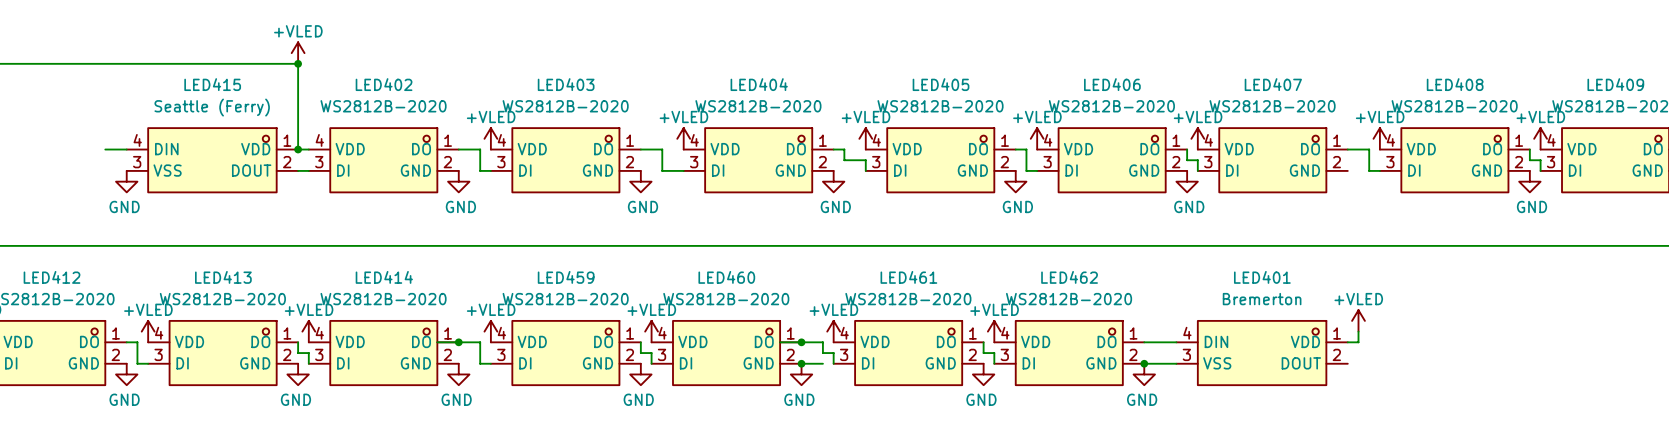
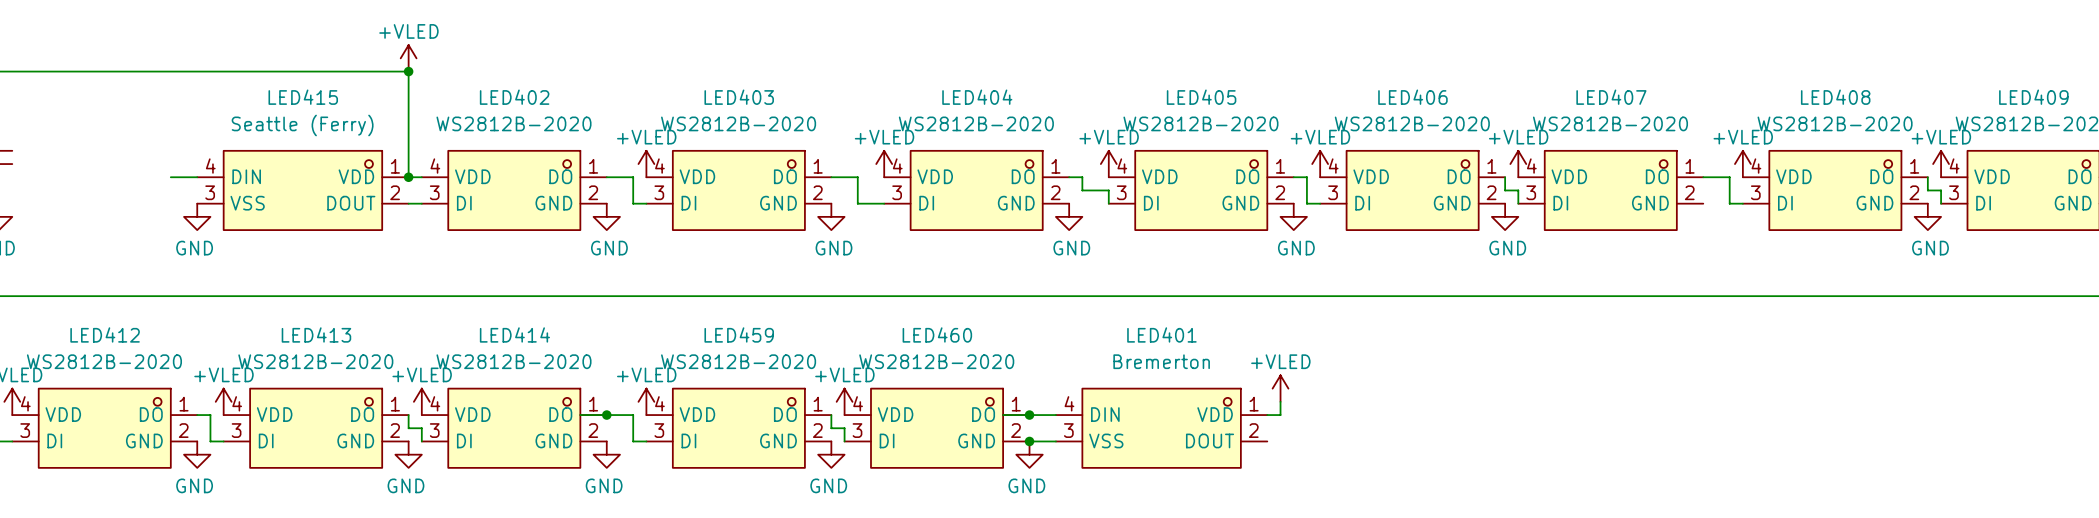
power symbol: +VLED (1358, 320) -> none
power symbol: +VLED (833, 331) -> none
power symbol position: +VLED (994, 331) -> +VLED (1280, 388)
wire: (1358, 331) (1358, 342) (1347, 342) -> none
wire: (822, 342) (822, 353) (833, 353) (833, 363) -> none
wire: (983, 342) (983, 353) (994, 353) (994, 363) -> none
wire: (1144, 342) (1176, 342) -> none
LED461: WS2812B-2020 (908, 353) -> none
LED462: WS2812B-2020 (1069, 353) -> none
LED401 position: (1262, 353) -> (1161, 428)
wire: (1144, 363) (1176, 363) -> none
junction: (1144, 363) -> none
power symbol: GND (983, 374) -> none
power symbol: GND (1144, 374) -> none

